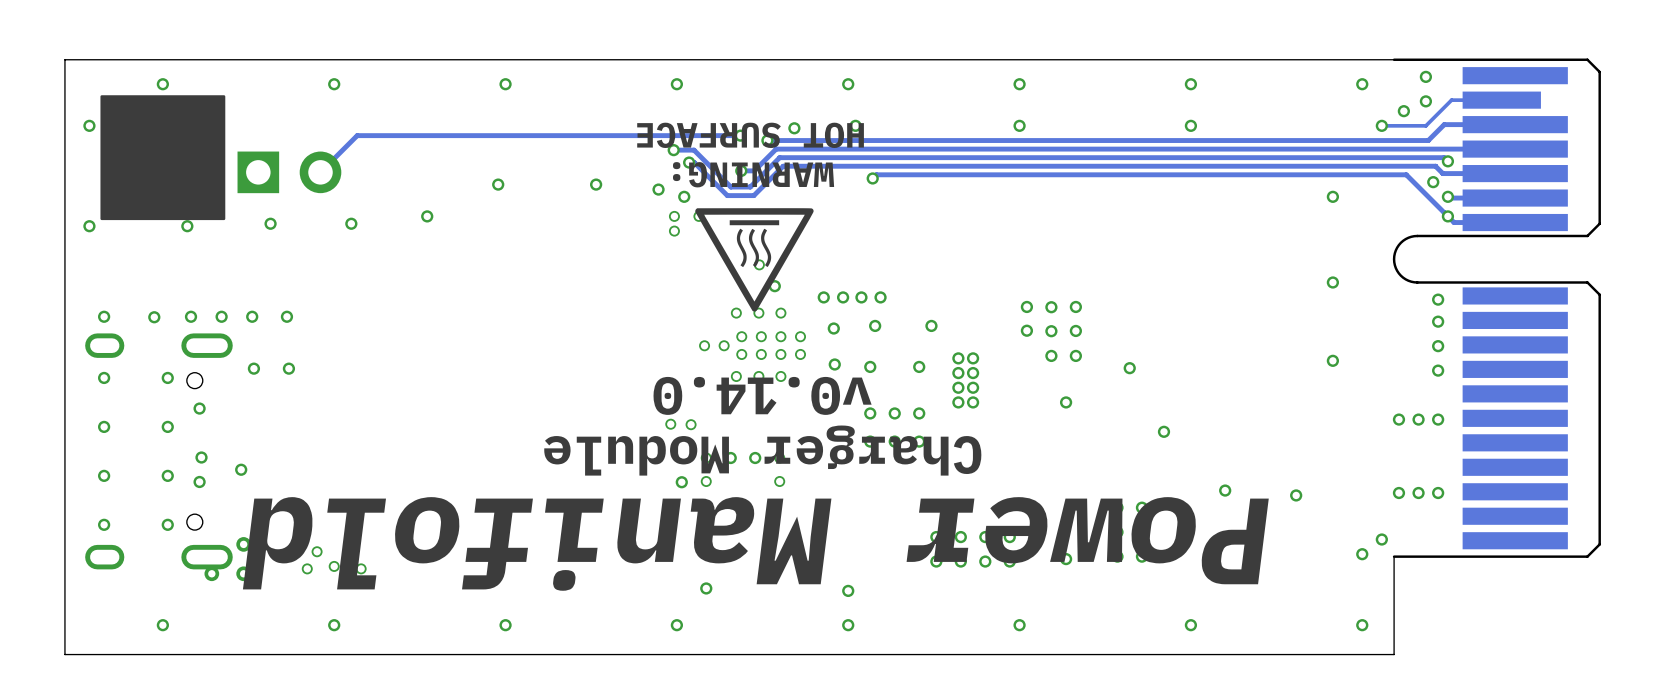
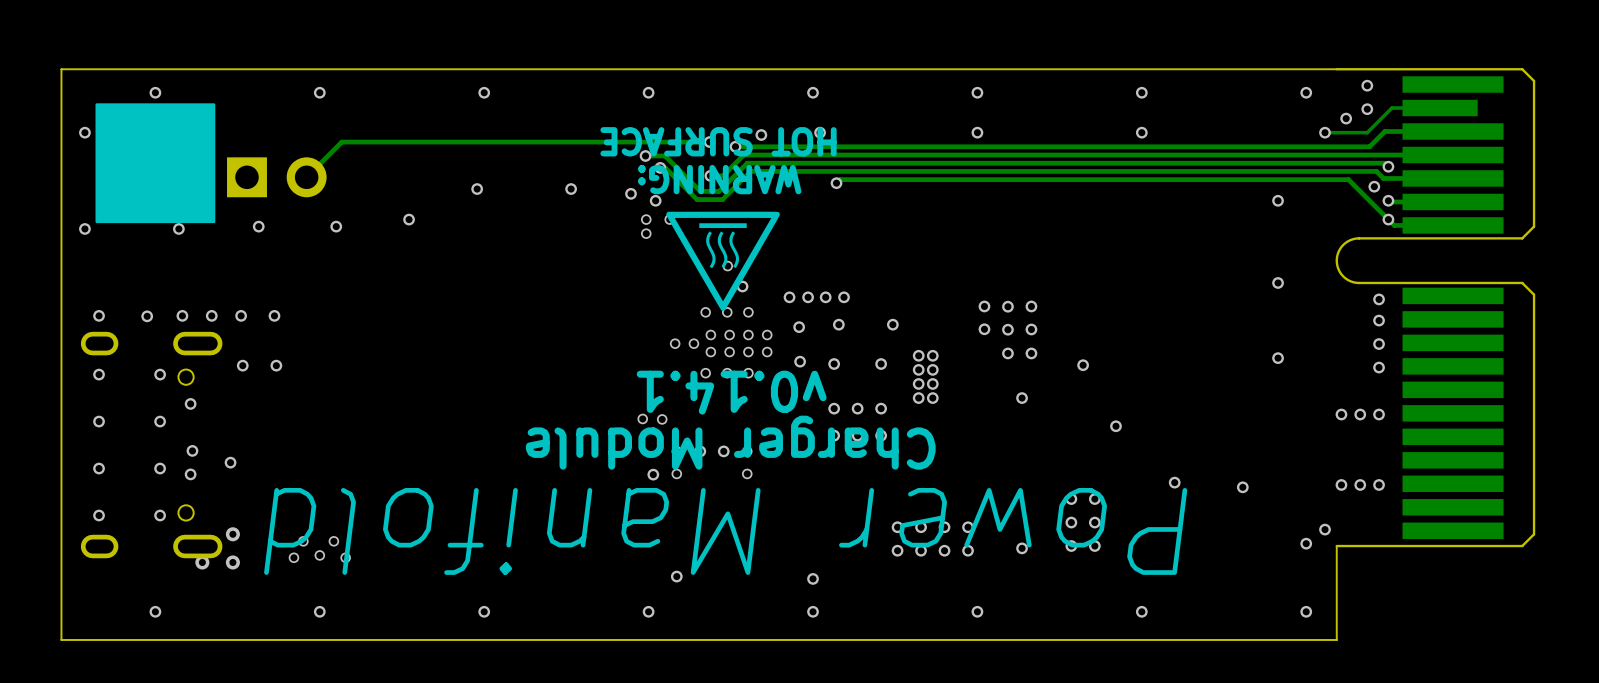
text: v0.14.0 (762, 395) -> v0.14.1 (731, 392)

